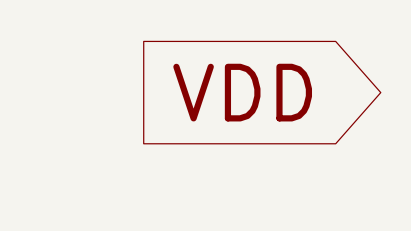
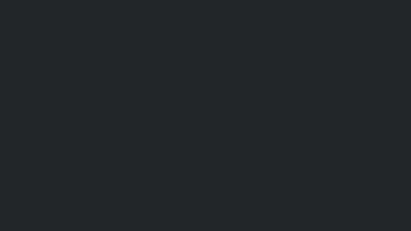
global label: VDD (242, 92) -> none

